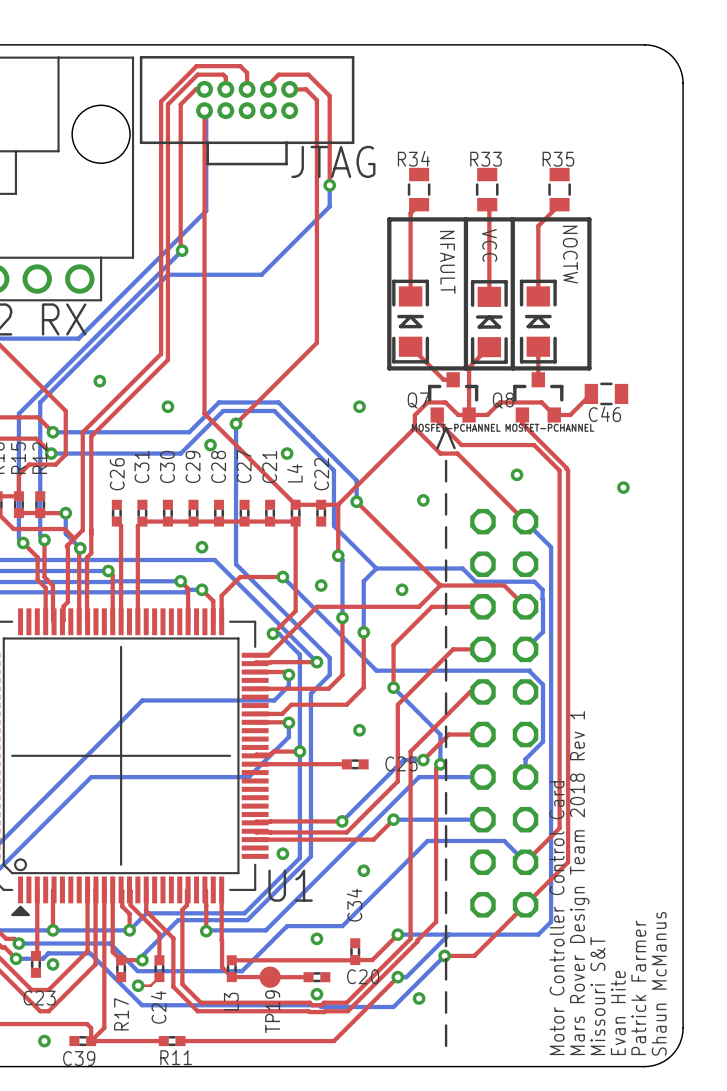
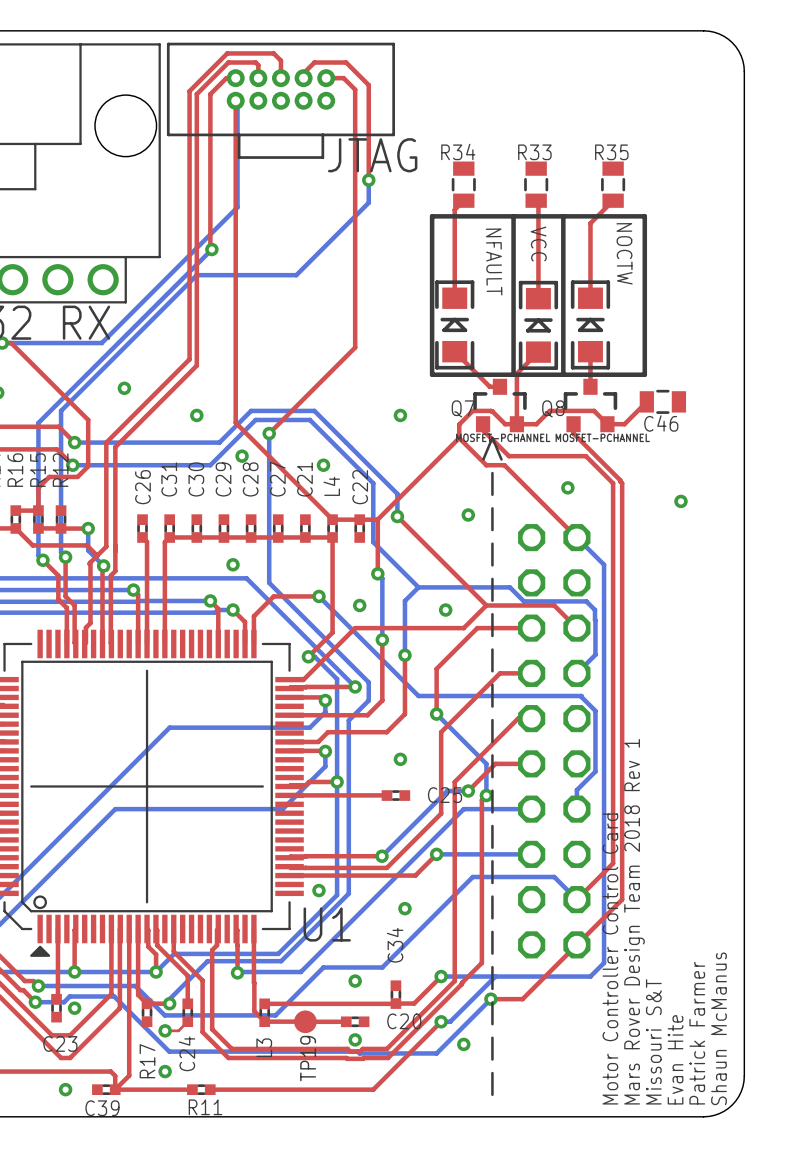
via: none -> (165, 1071)

